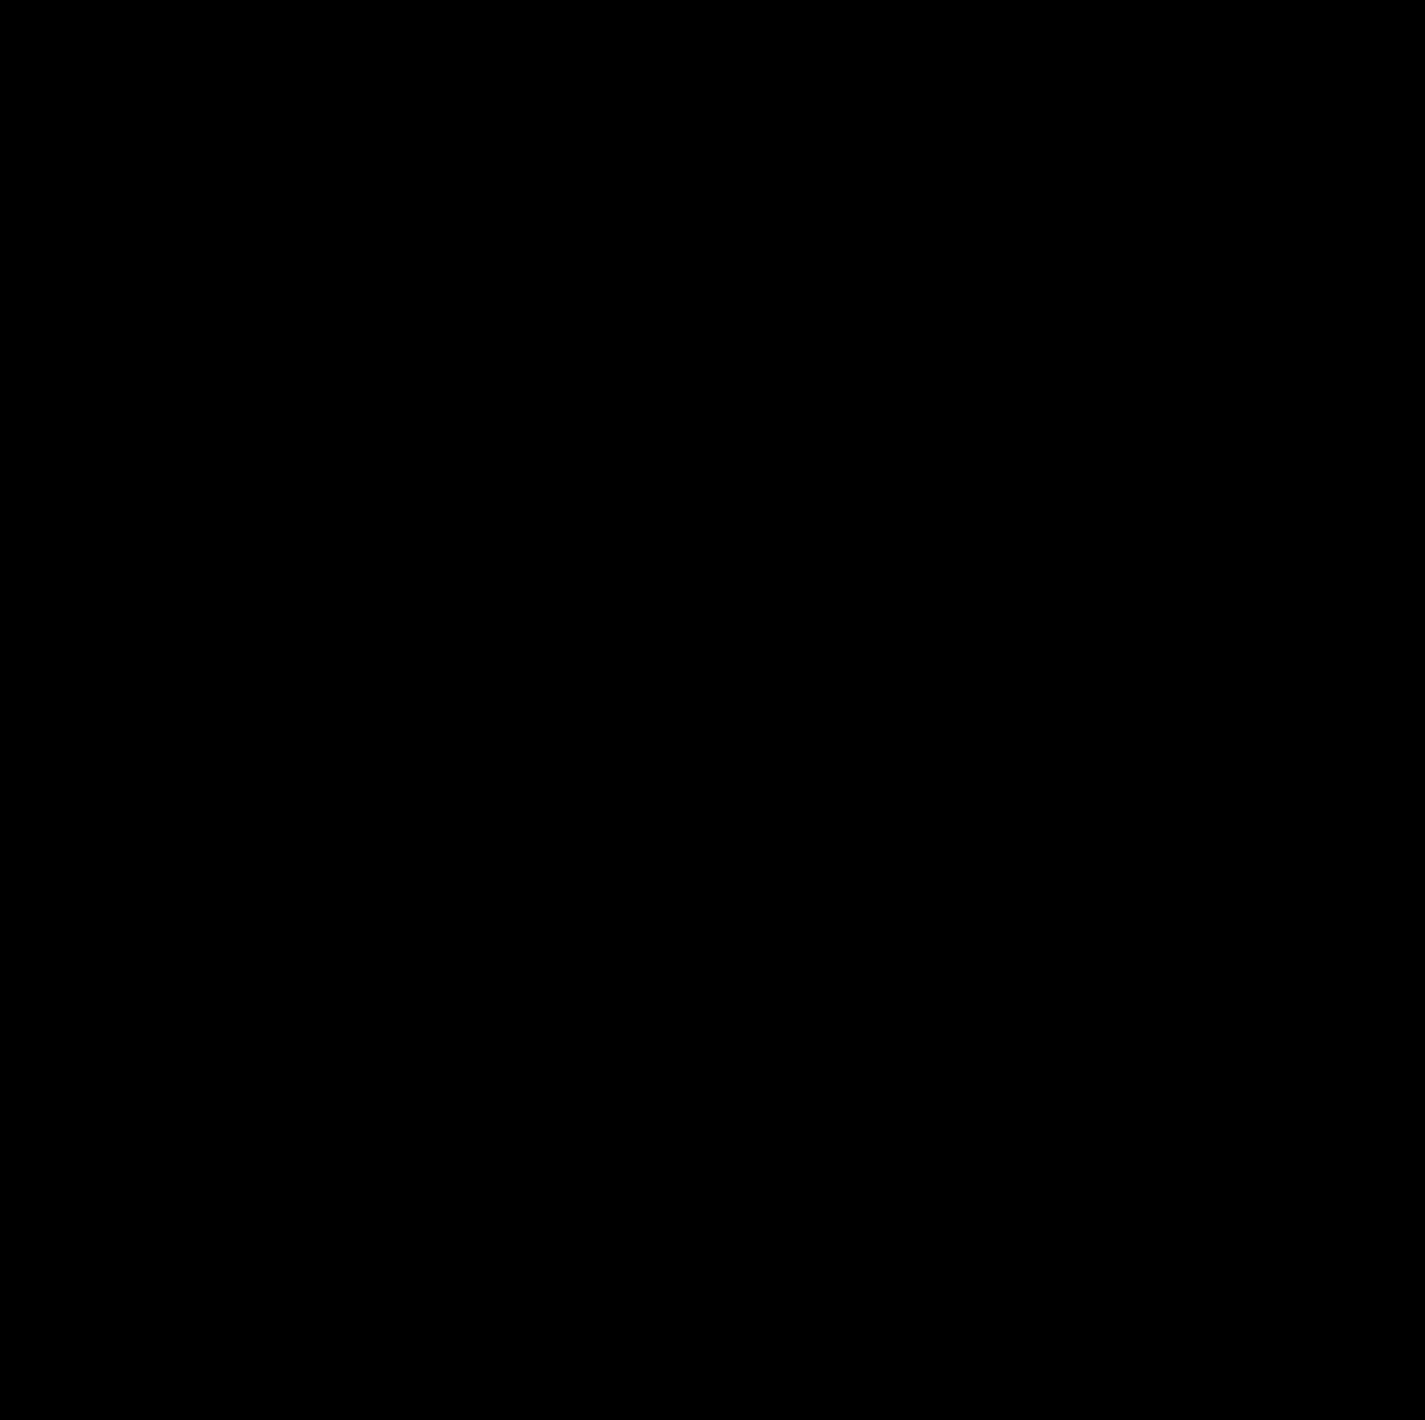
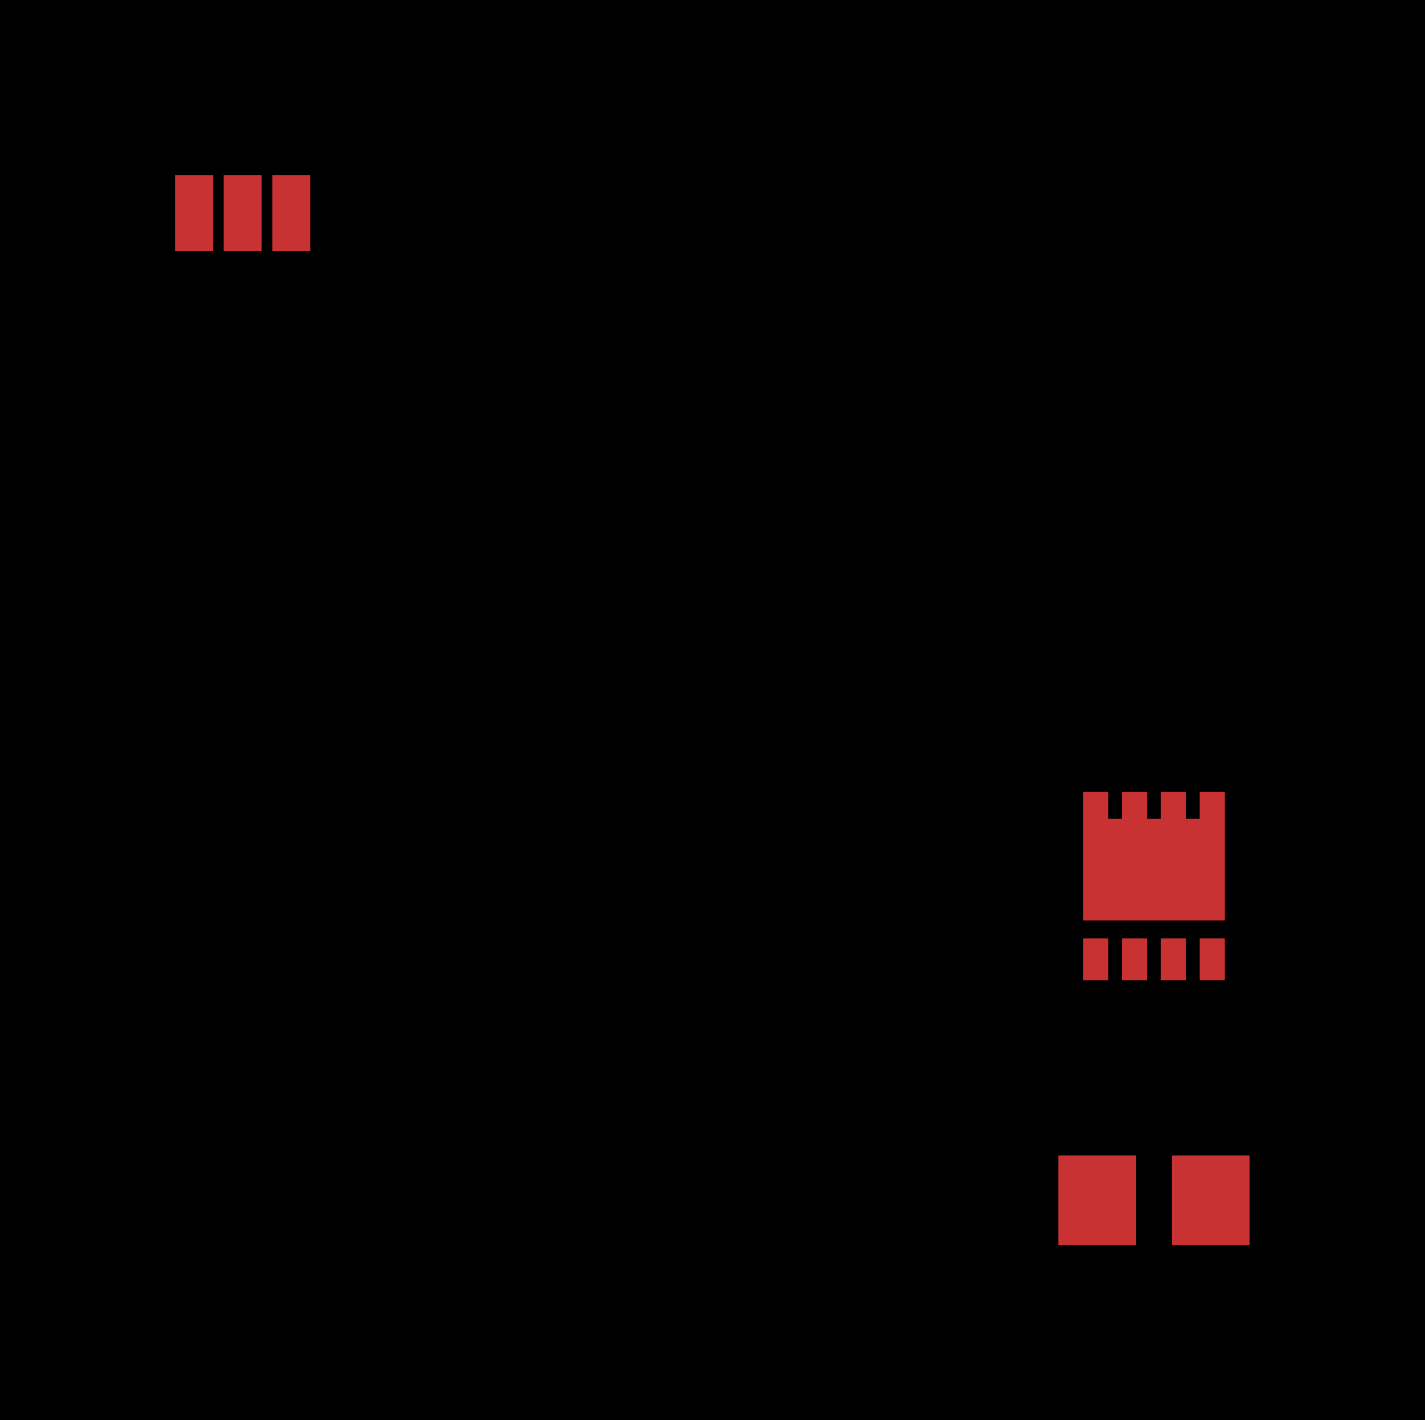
part: none -> (242, 213)
part: none -> (1153, 886)
part: none -> (1153, 1200)

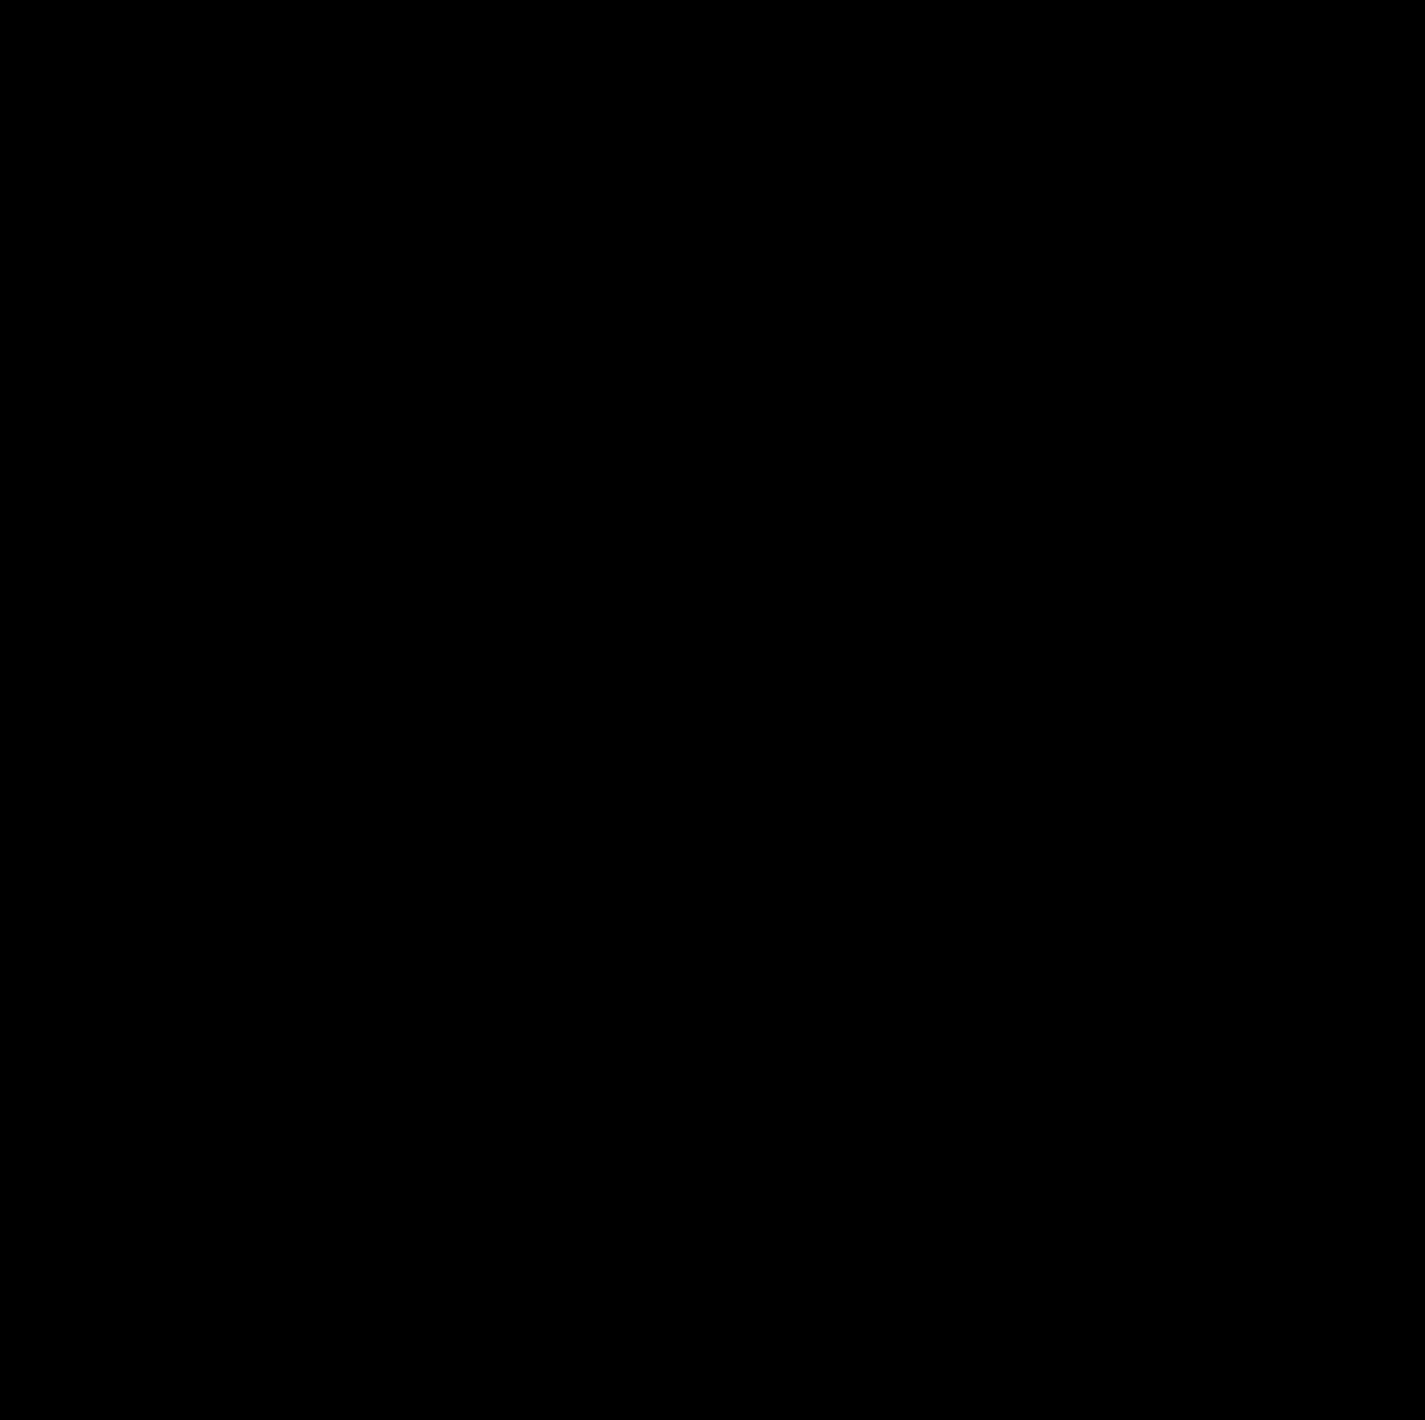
part: (242, 213) -> none
part: (1153, 886) -> none
part: (1153, 1200) -> none

